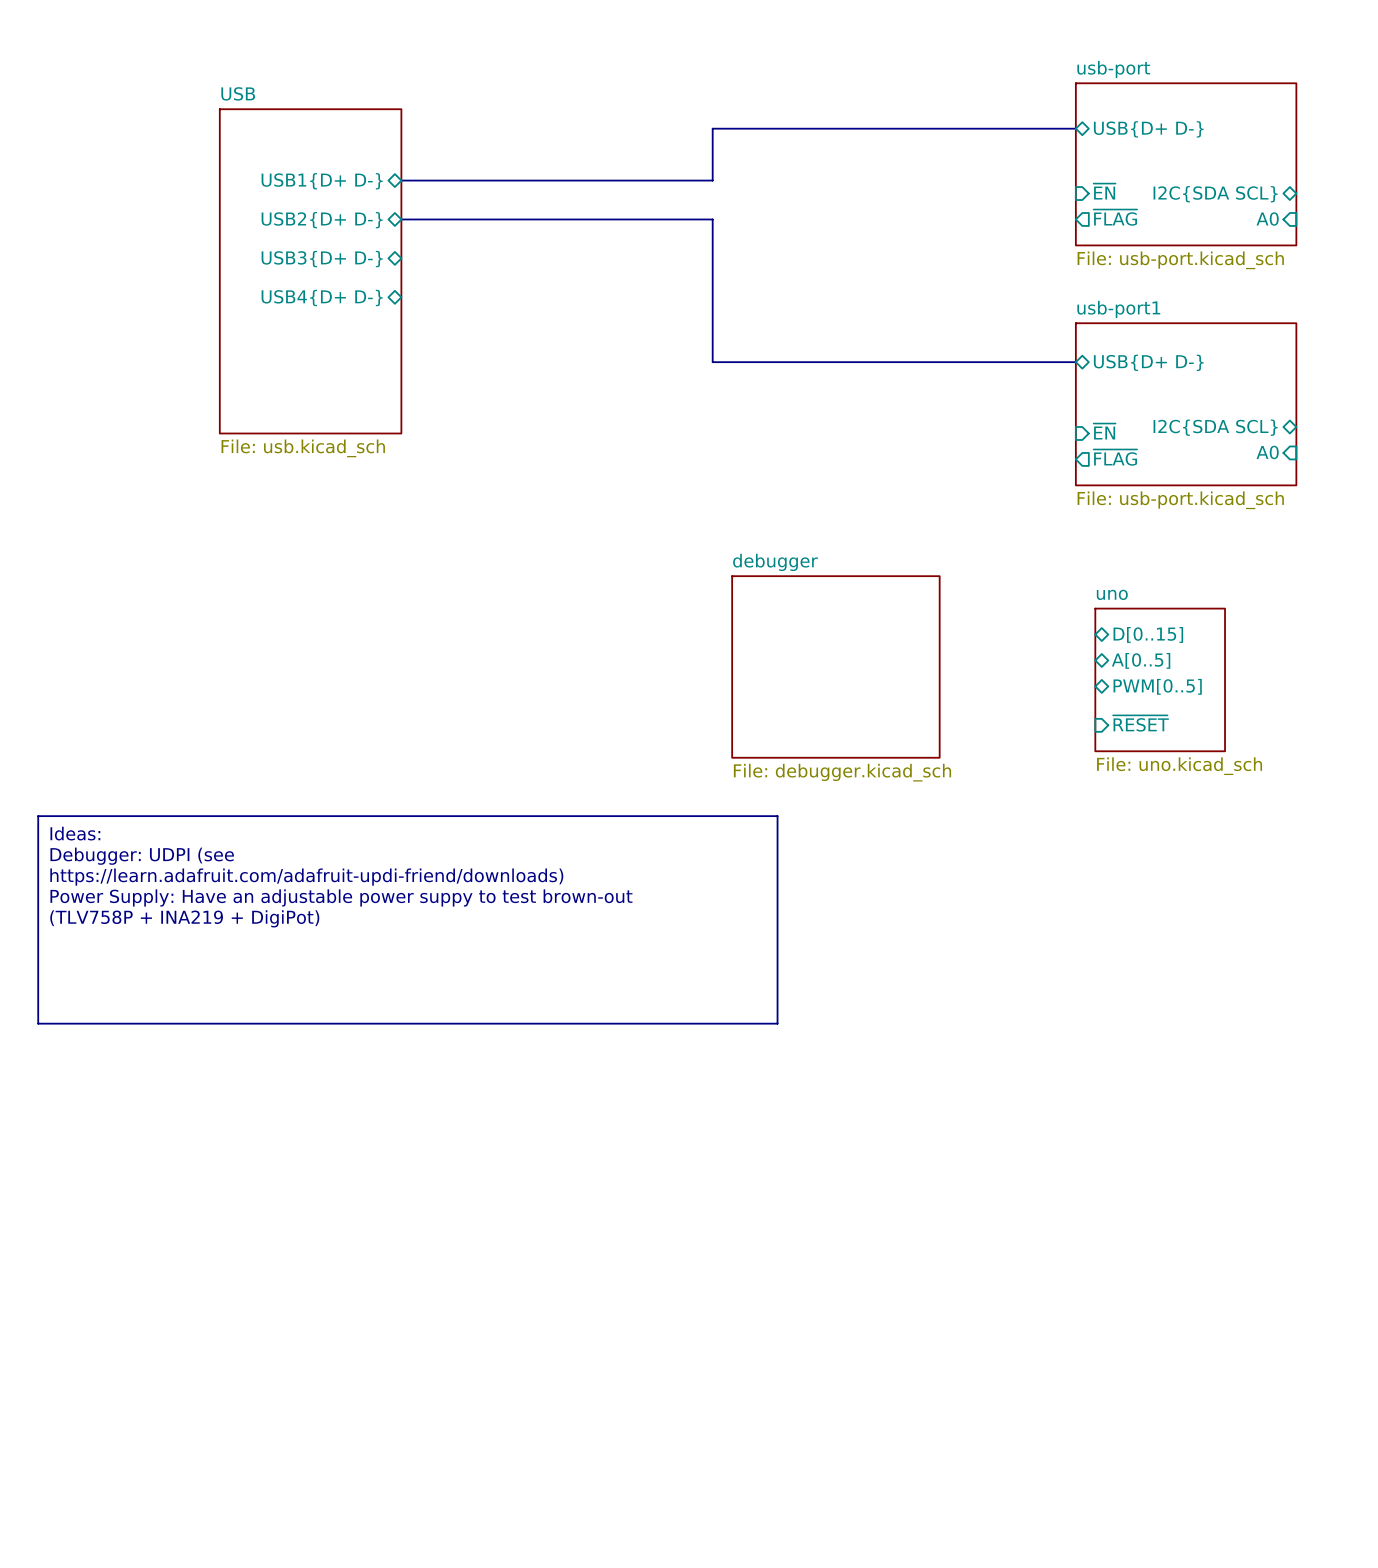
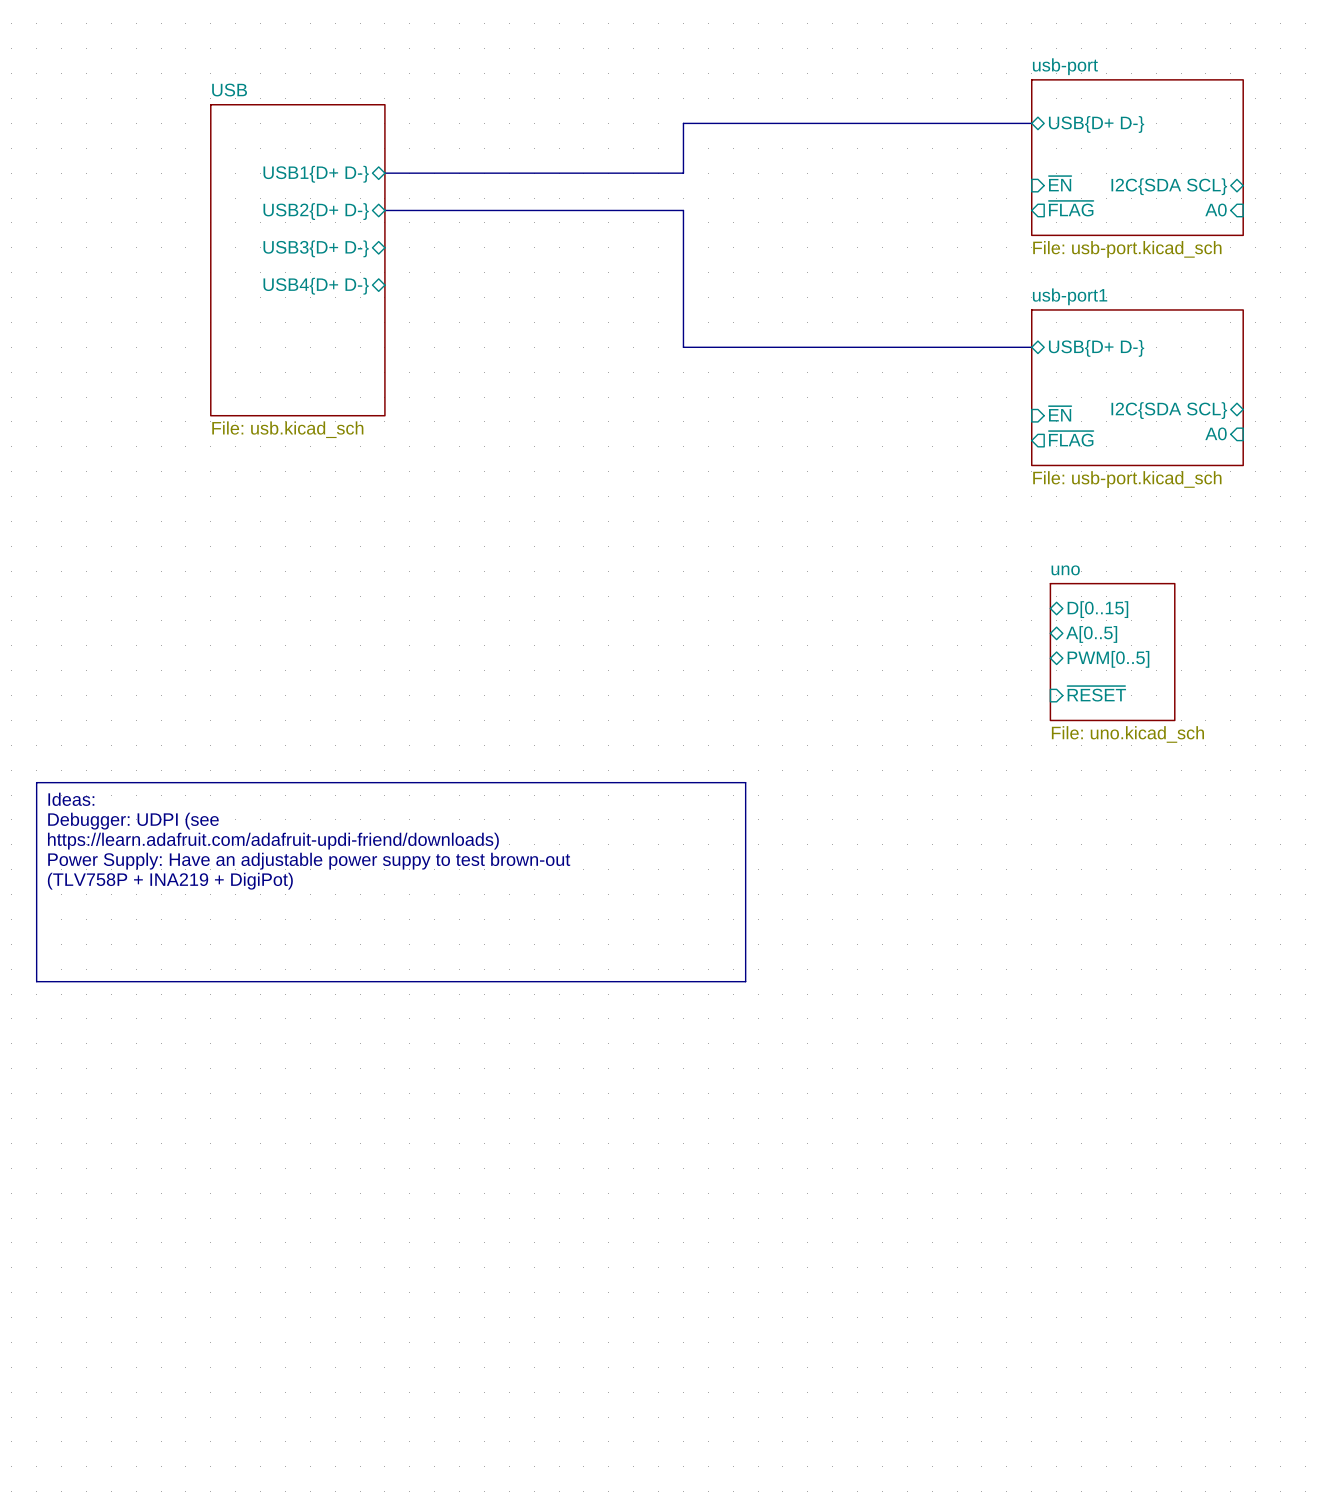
sheet debugger: File: debugger.kicad_sch (835, 666) -> none

